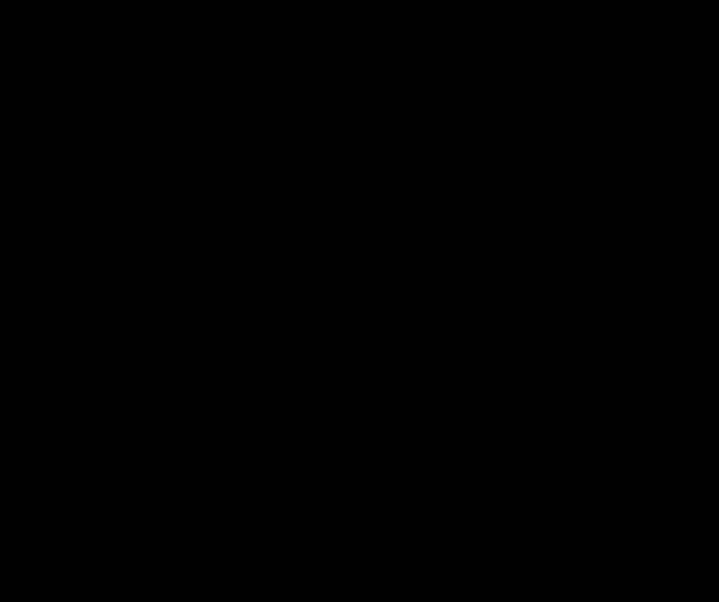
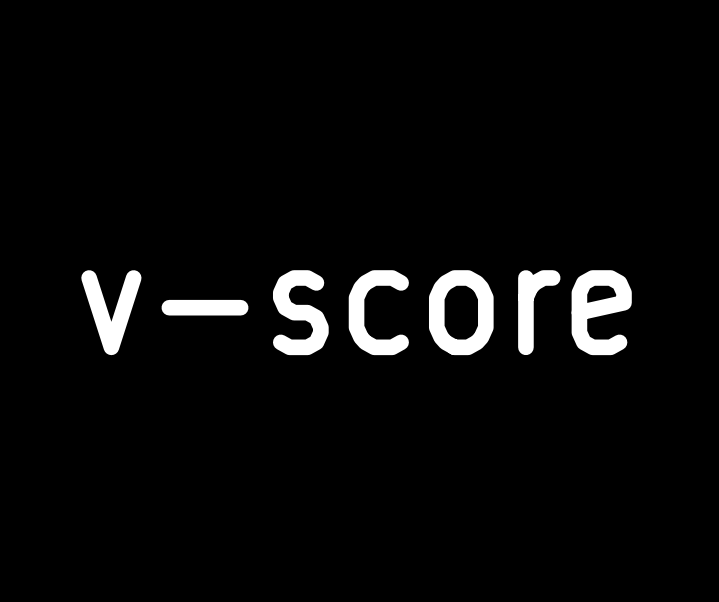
text: none -> v-score (356, 312)

